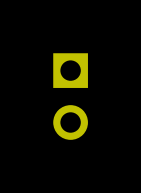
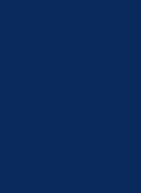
part: (70, 96) -> none

